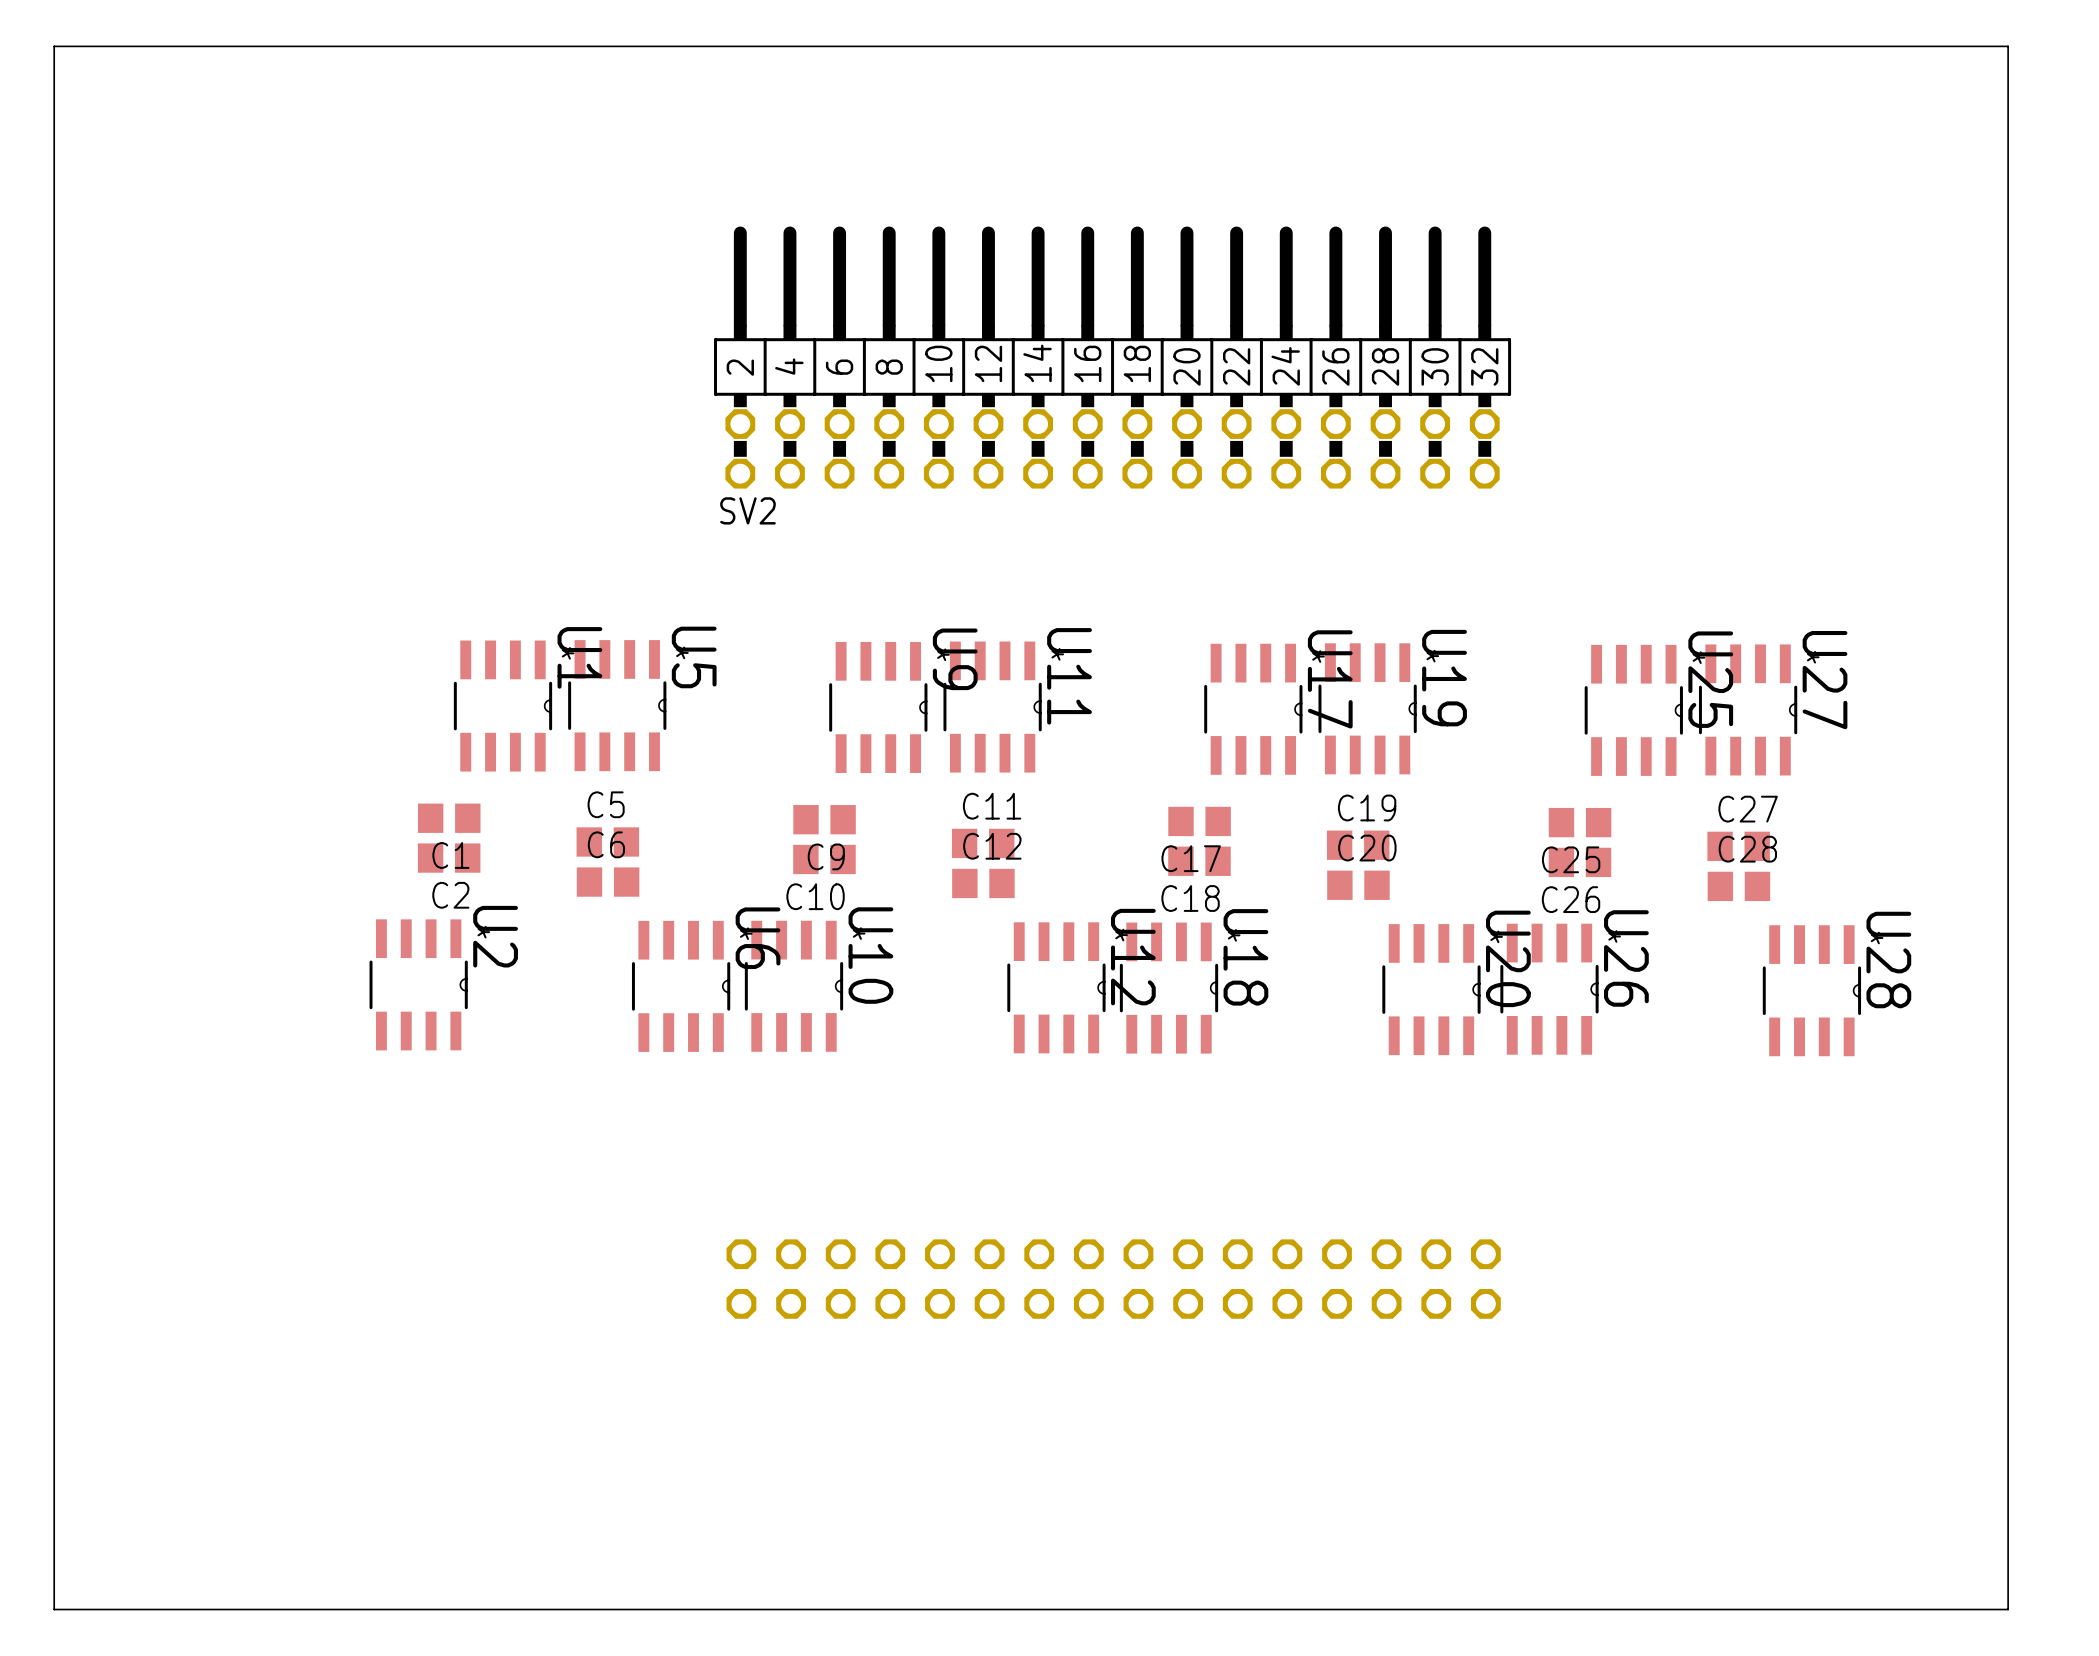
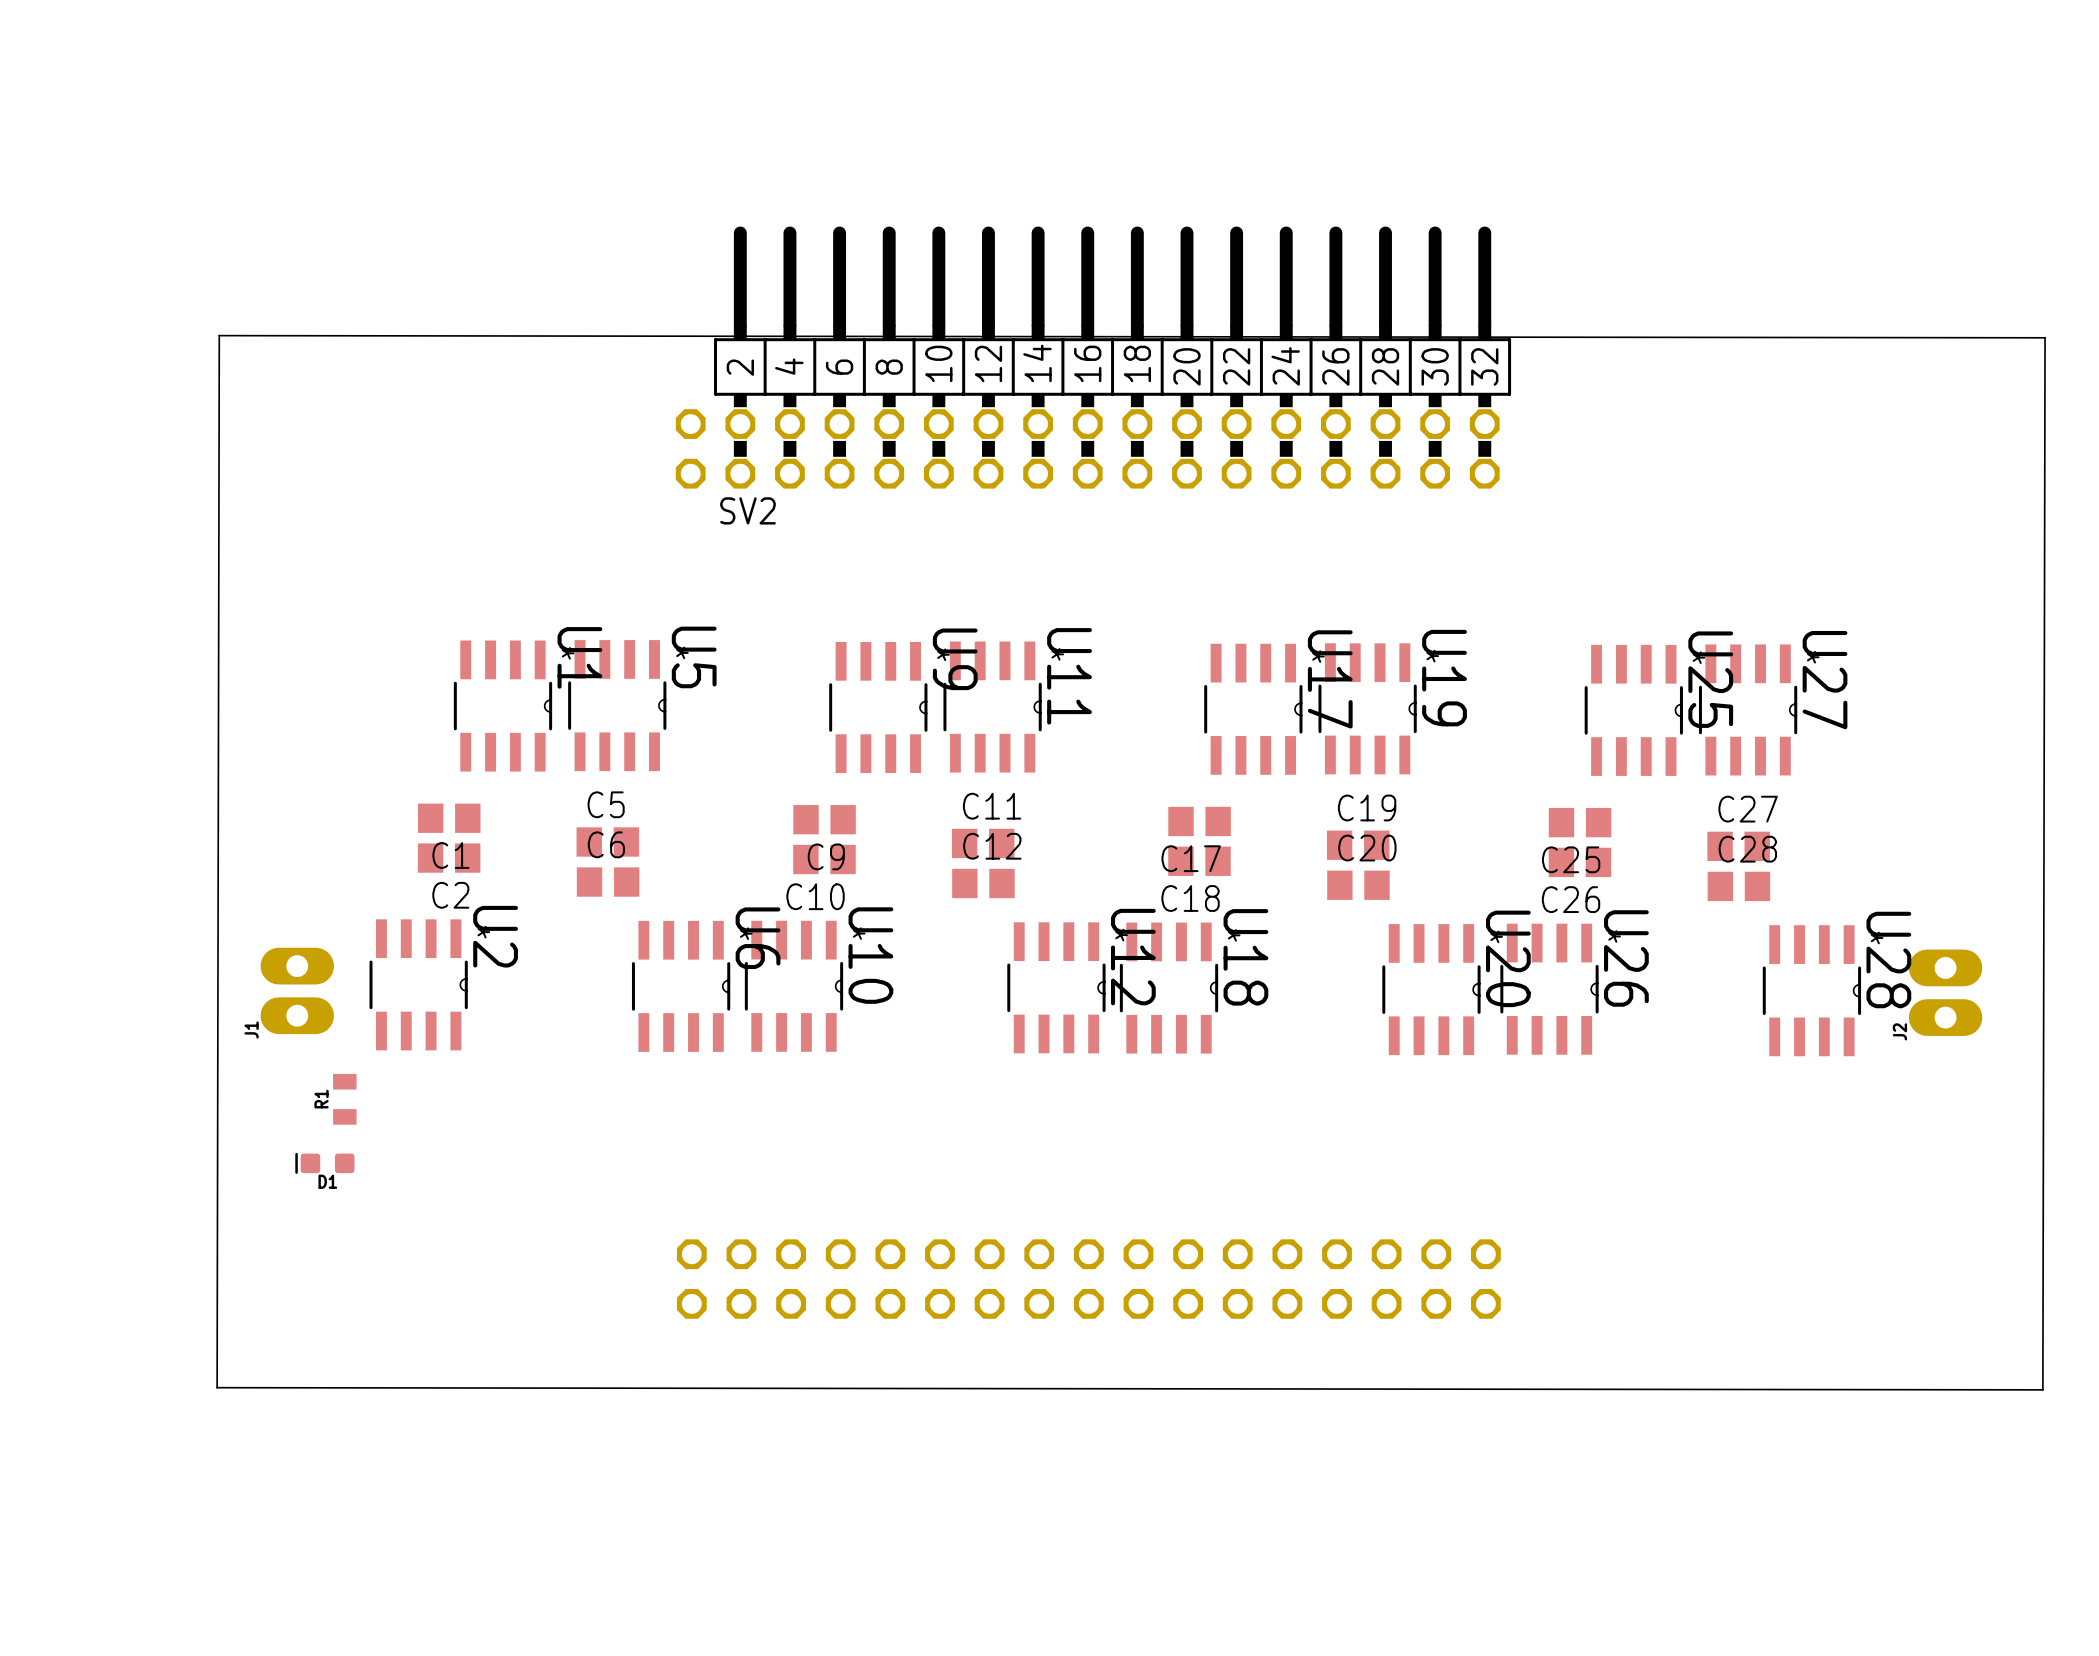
board edge: (54, 46) (2008, 46) (2008, 1609) (54, 1609) (54, 46) -> (219, 335) (217, 1387) (2042, 1389) (2045, 337) (219, 335)
SV2 footprint: [714, 226, 1512, 489] -> [675, 226, 1512, 489]
J1: none -> (297, 990)
J2: none -> (1945, 992)
R1: none -> (344, 1099)
D1: none -> (324, 1163)
part: none -> (1088, 1279)

